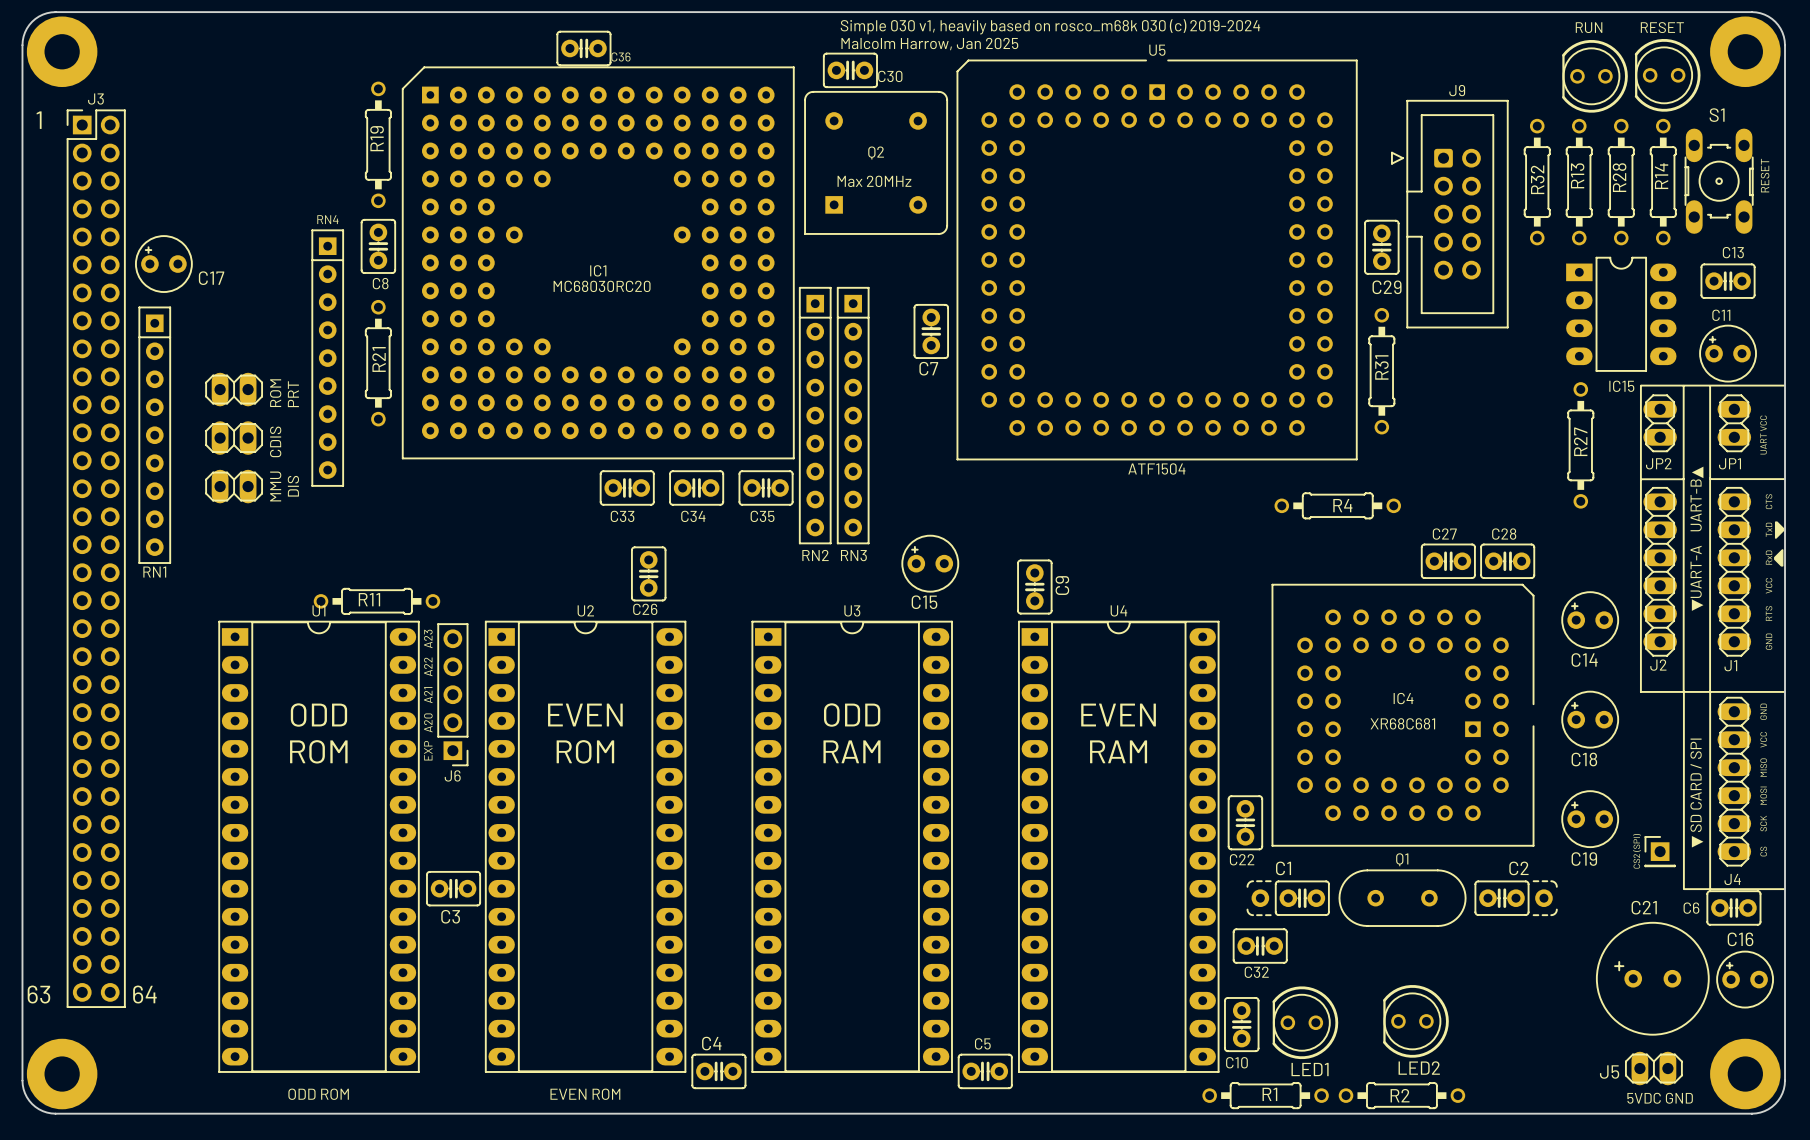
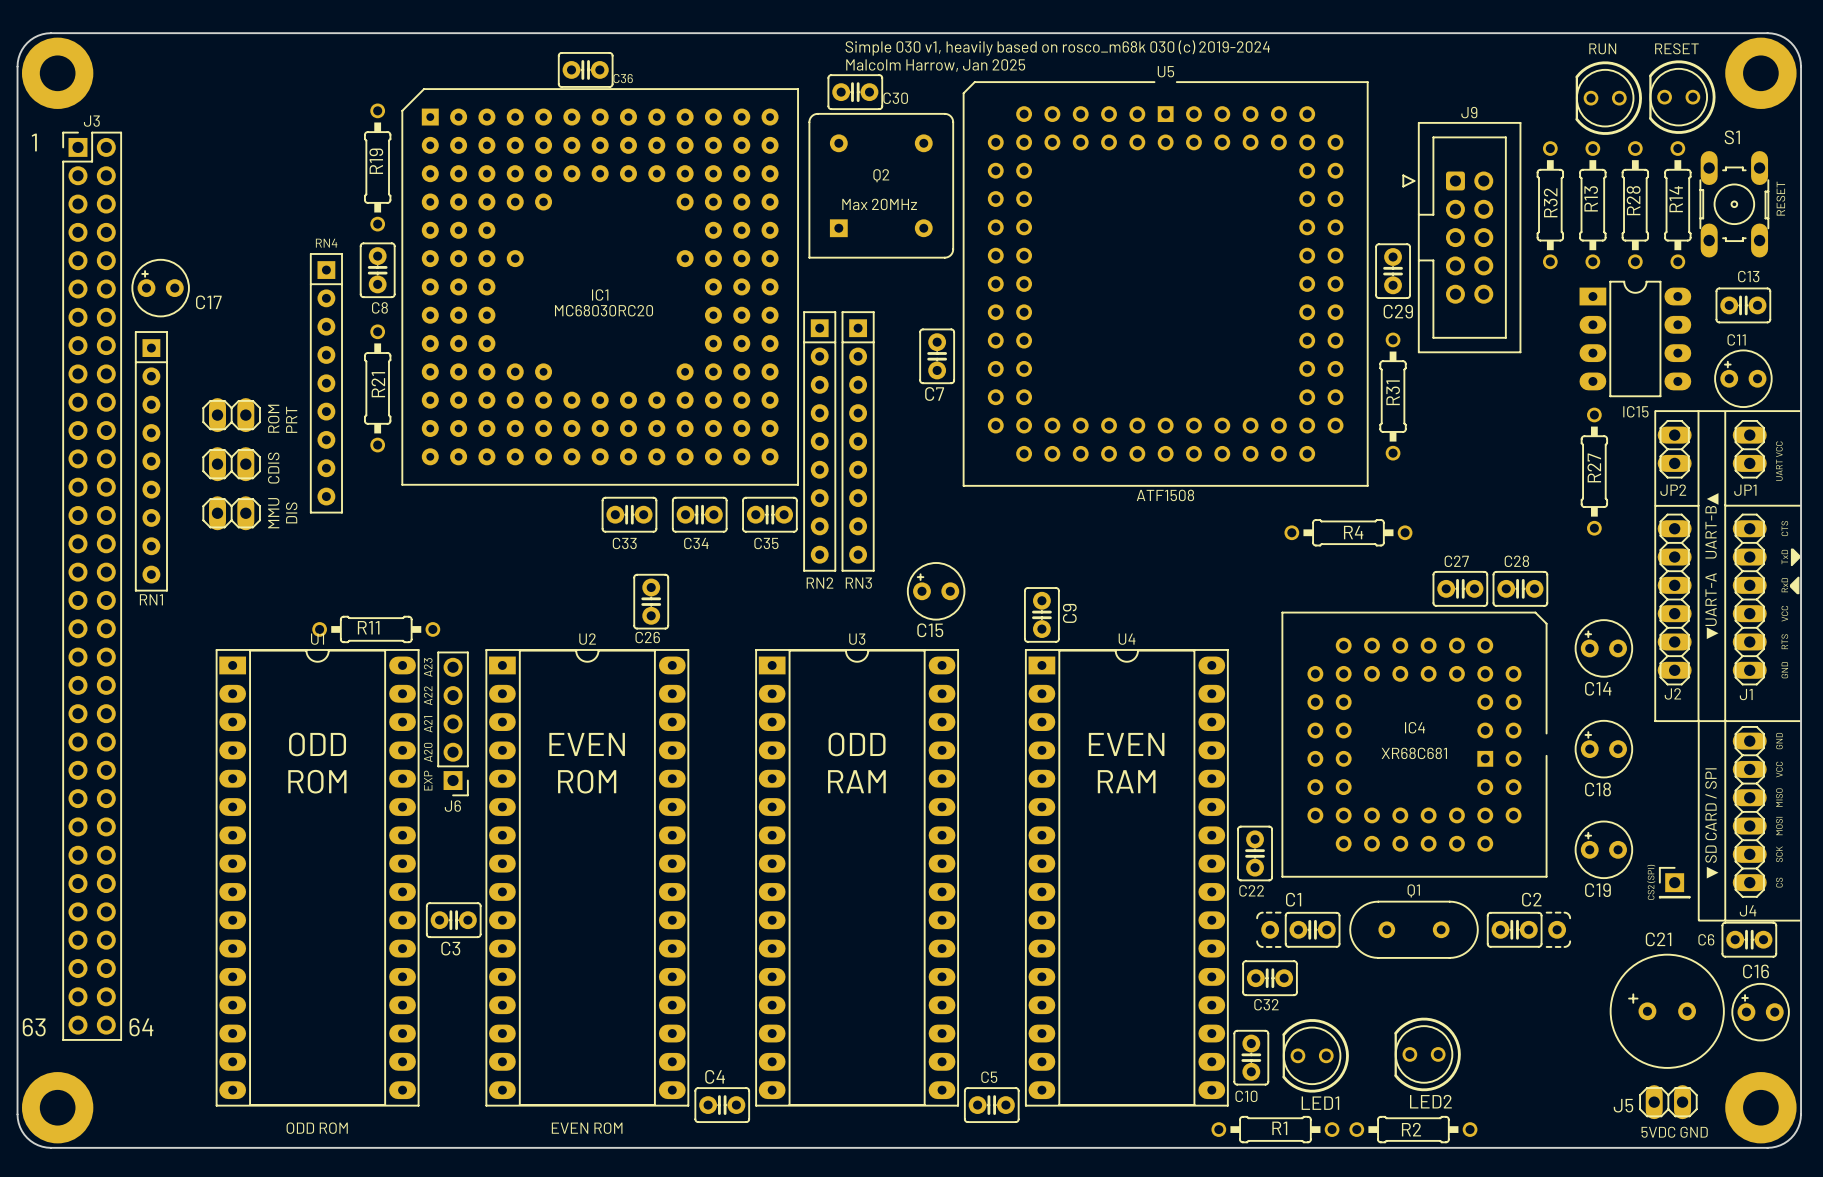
U5 value: ATF1504 (1156, 468) -> ATF1508 (1165, 495)

